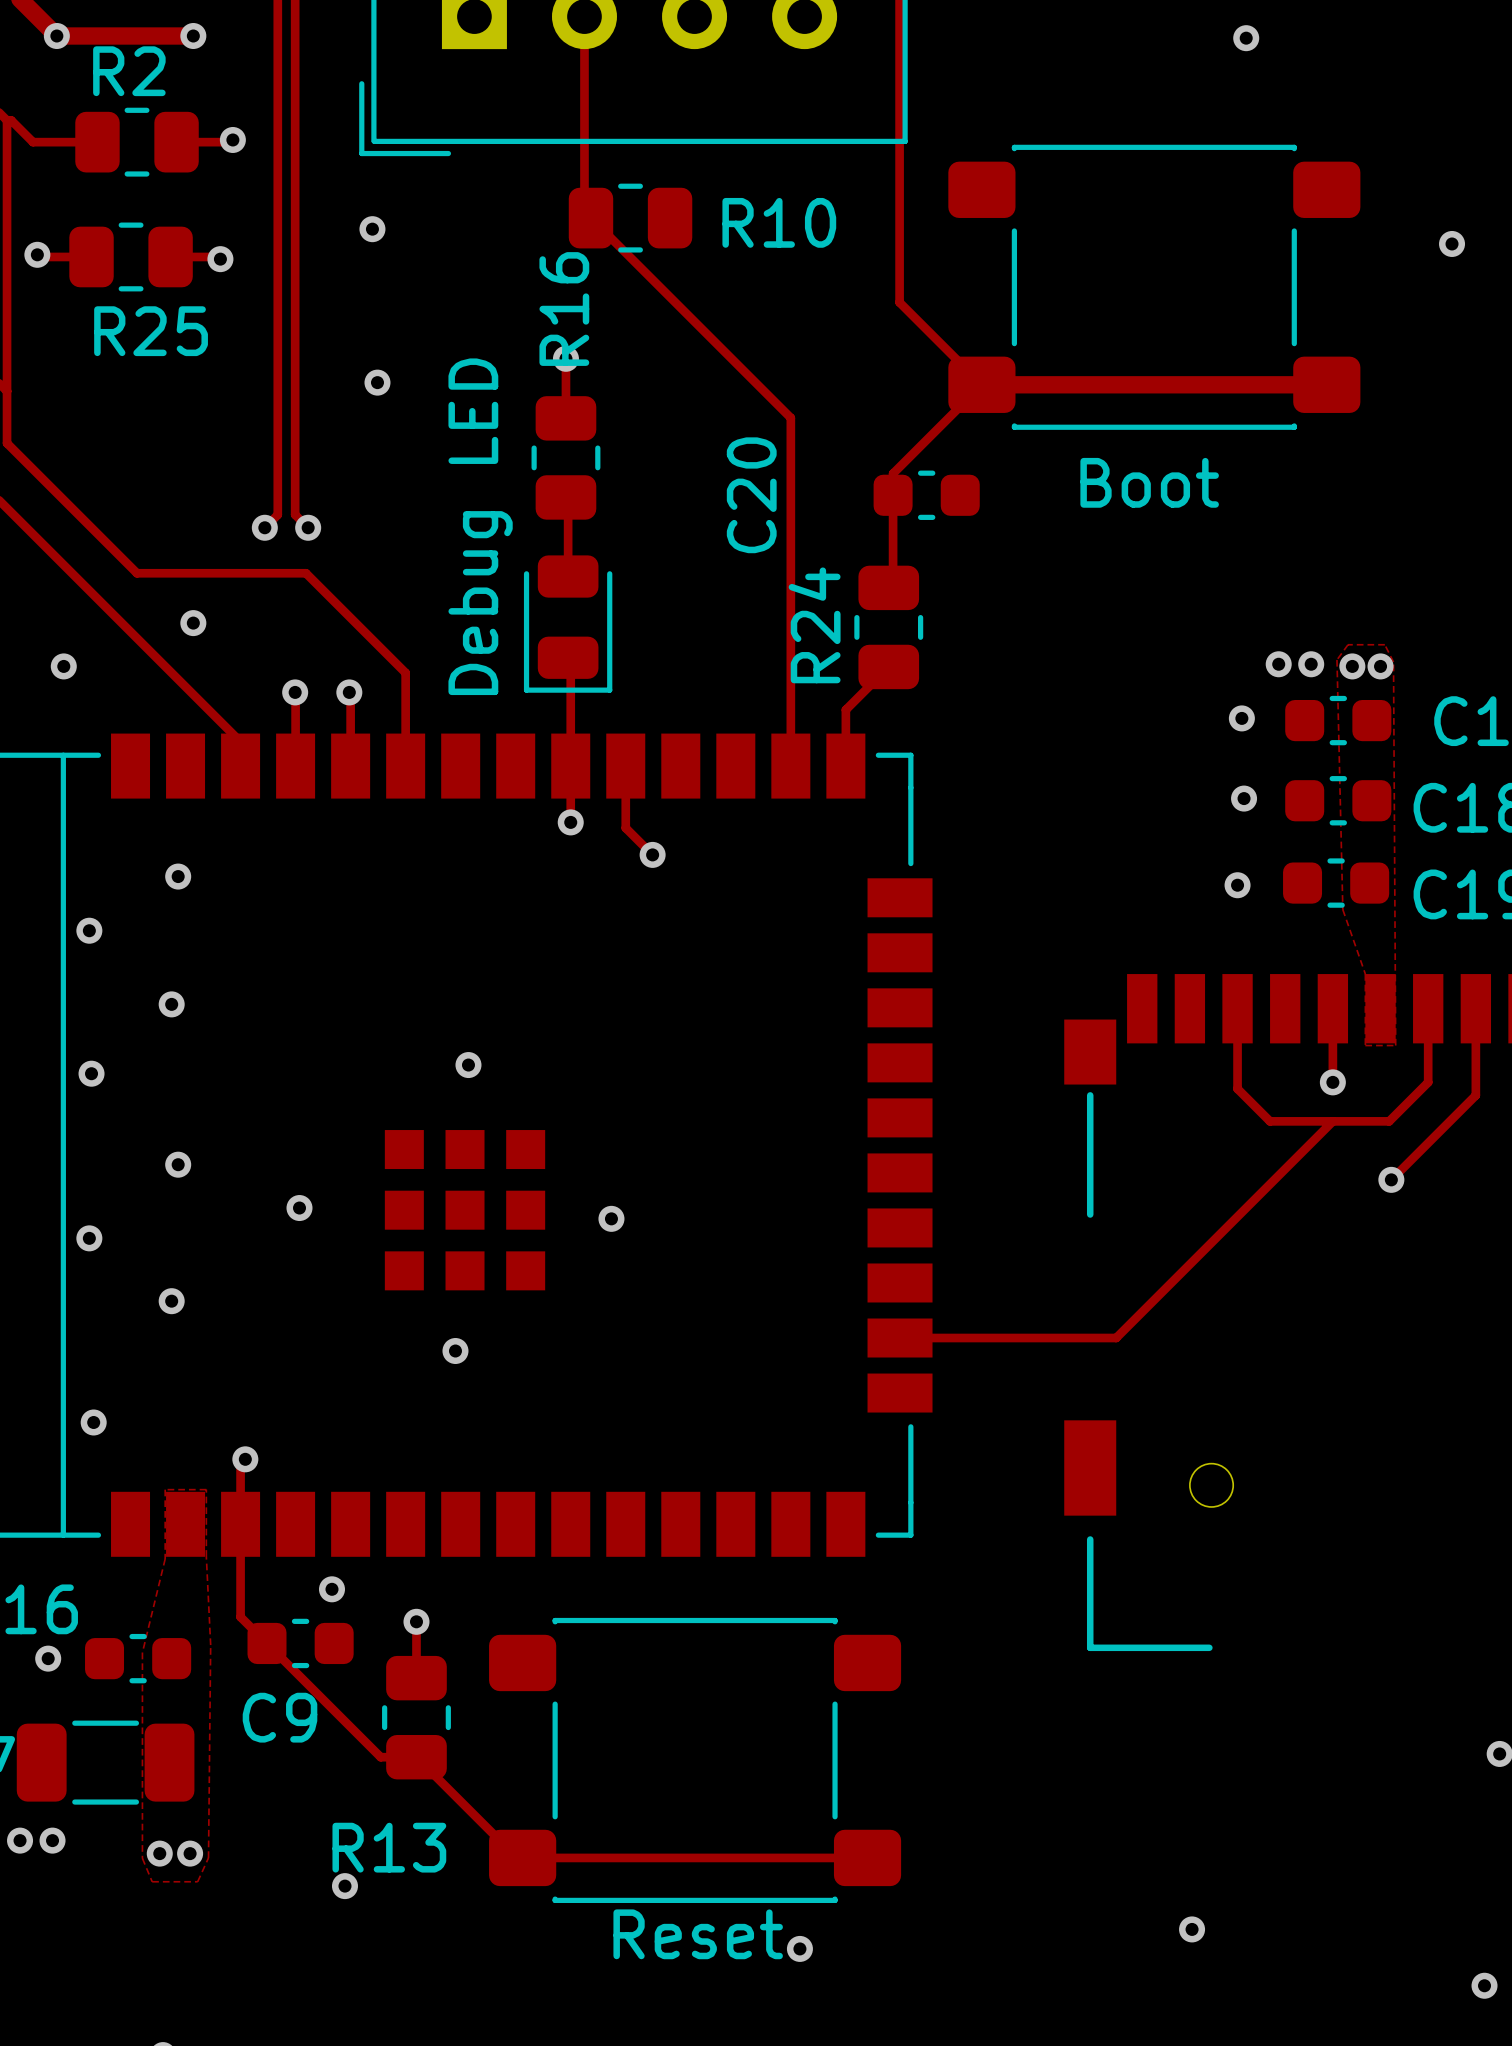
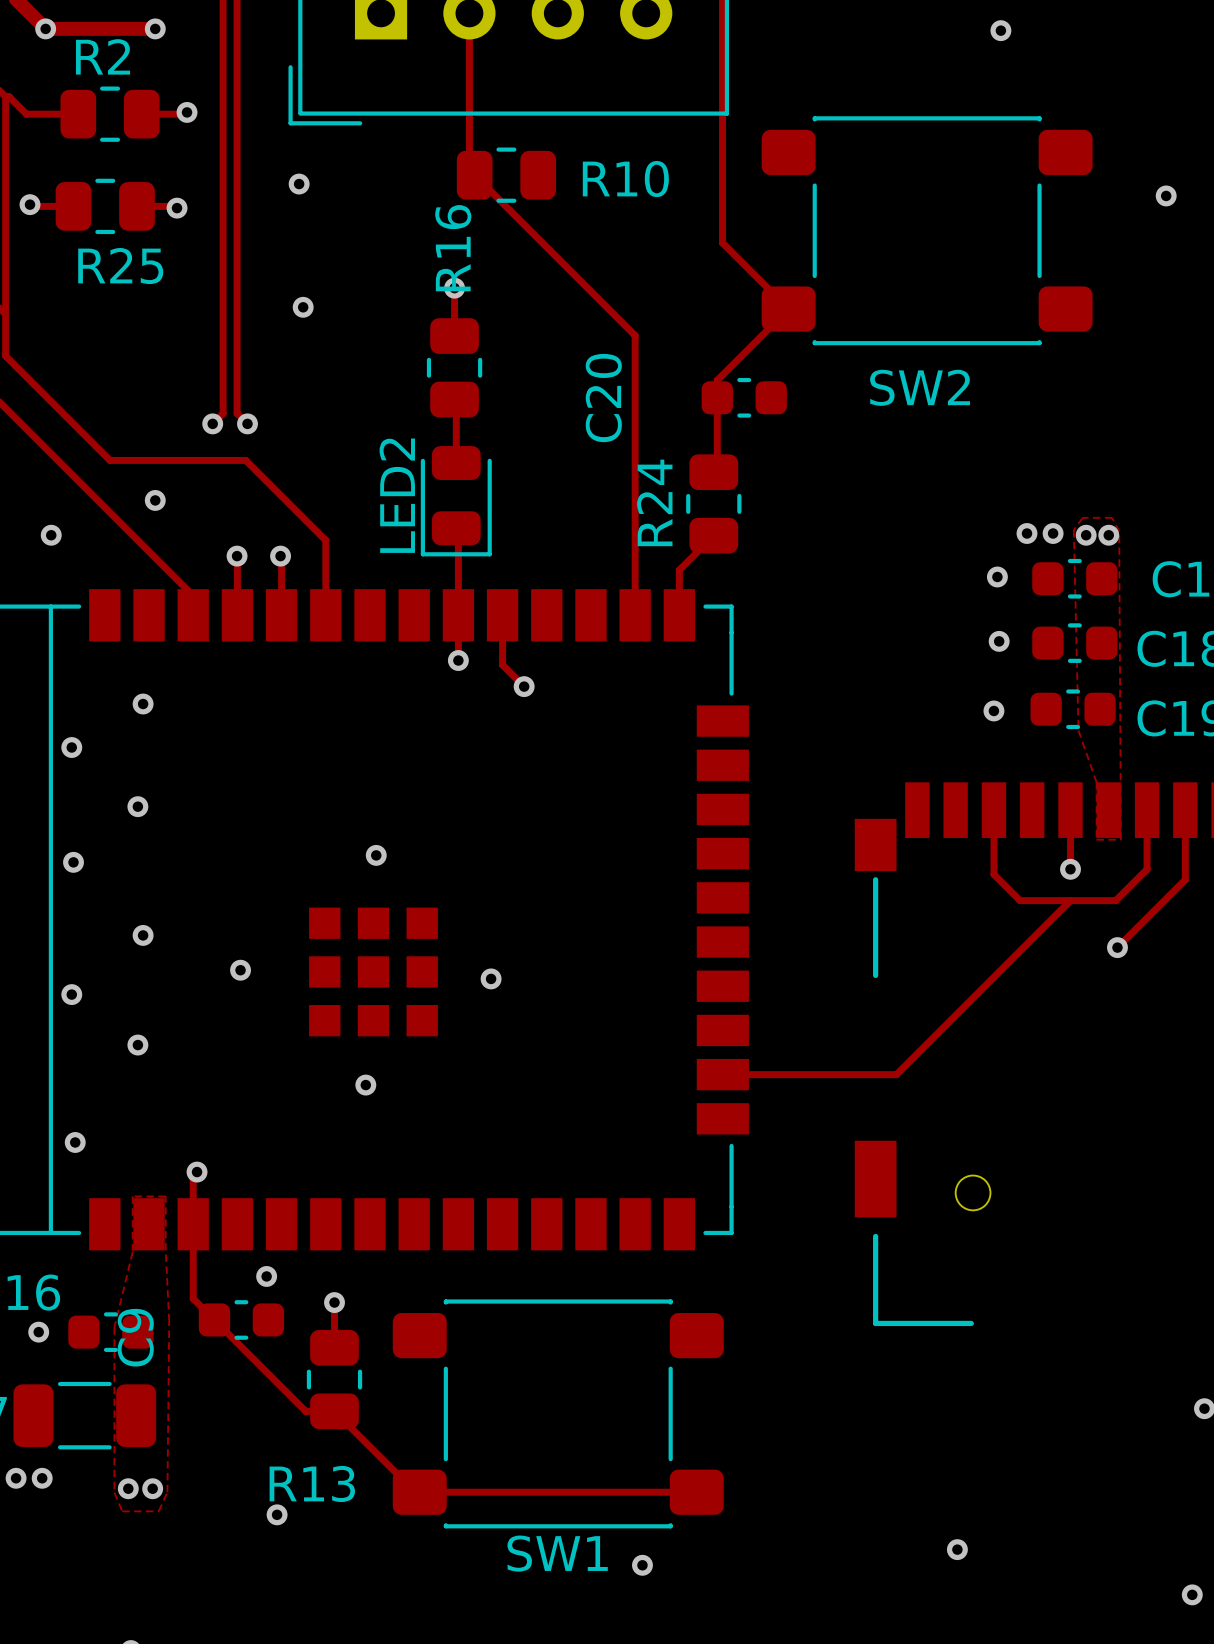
track: (981, 384) (1326, 384) -> none
Boot name: Boot (1149, 482) -> SW2 (920, 387)
Debug LED name: Debug LED (480, 526) -> LED2 (397, 495)
C9 name rotation: 0° (280, 1717) -> 90° counterclockwise (135, 1337)
C9 name position: C9 (280, 1717) -> C9 (135, 1337)
Reset name: Reset (698, 1934) -> SW1 (557, 1553)

